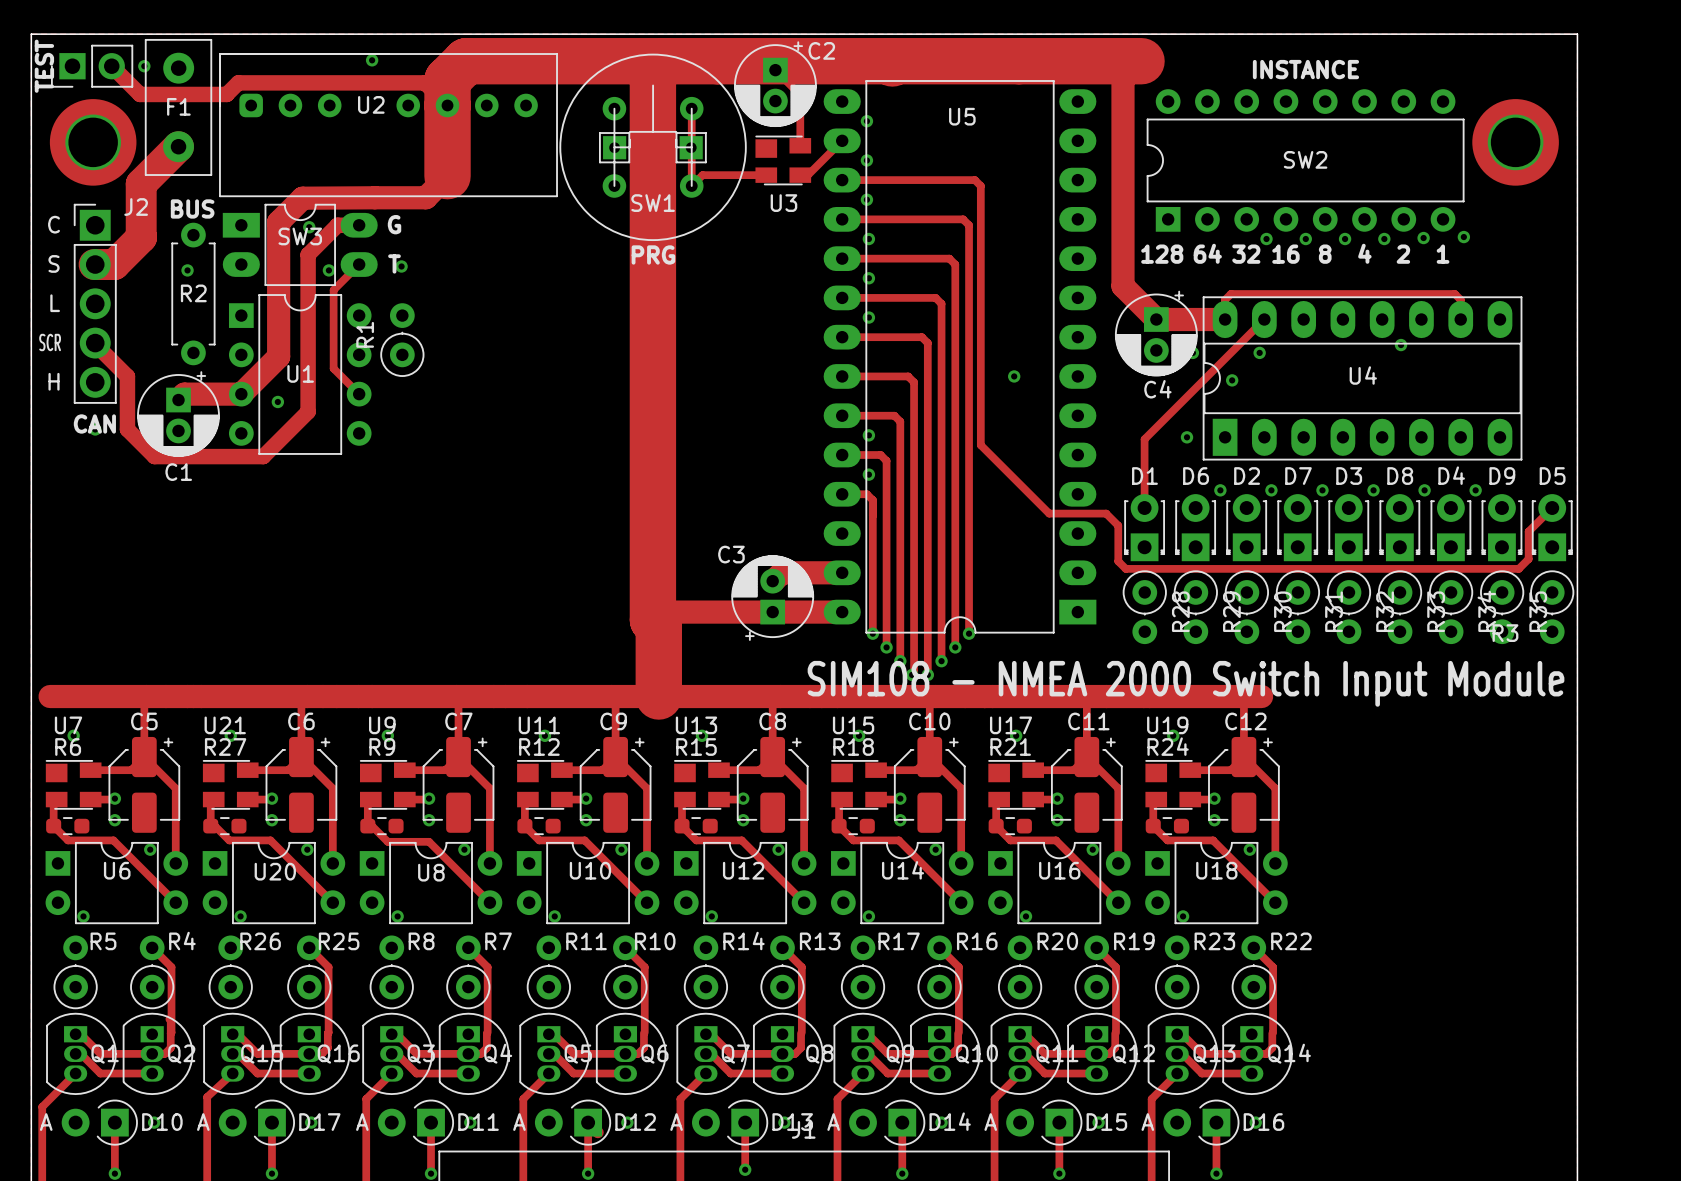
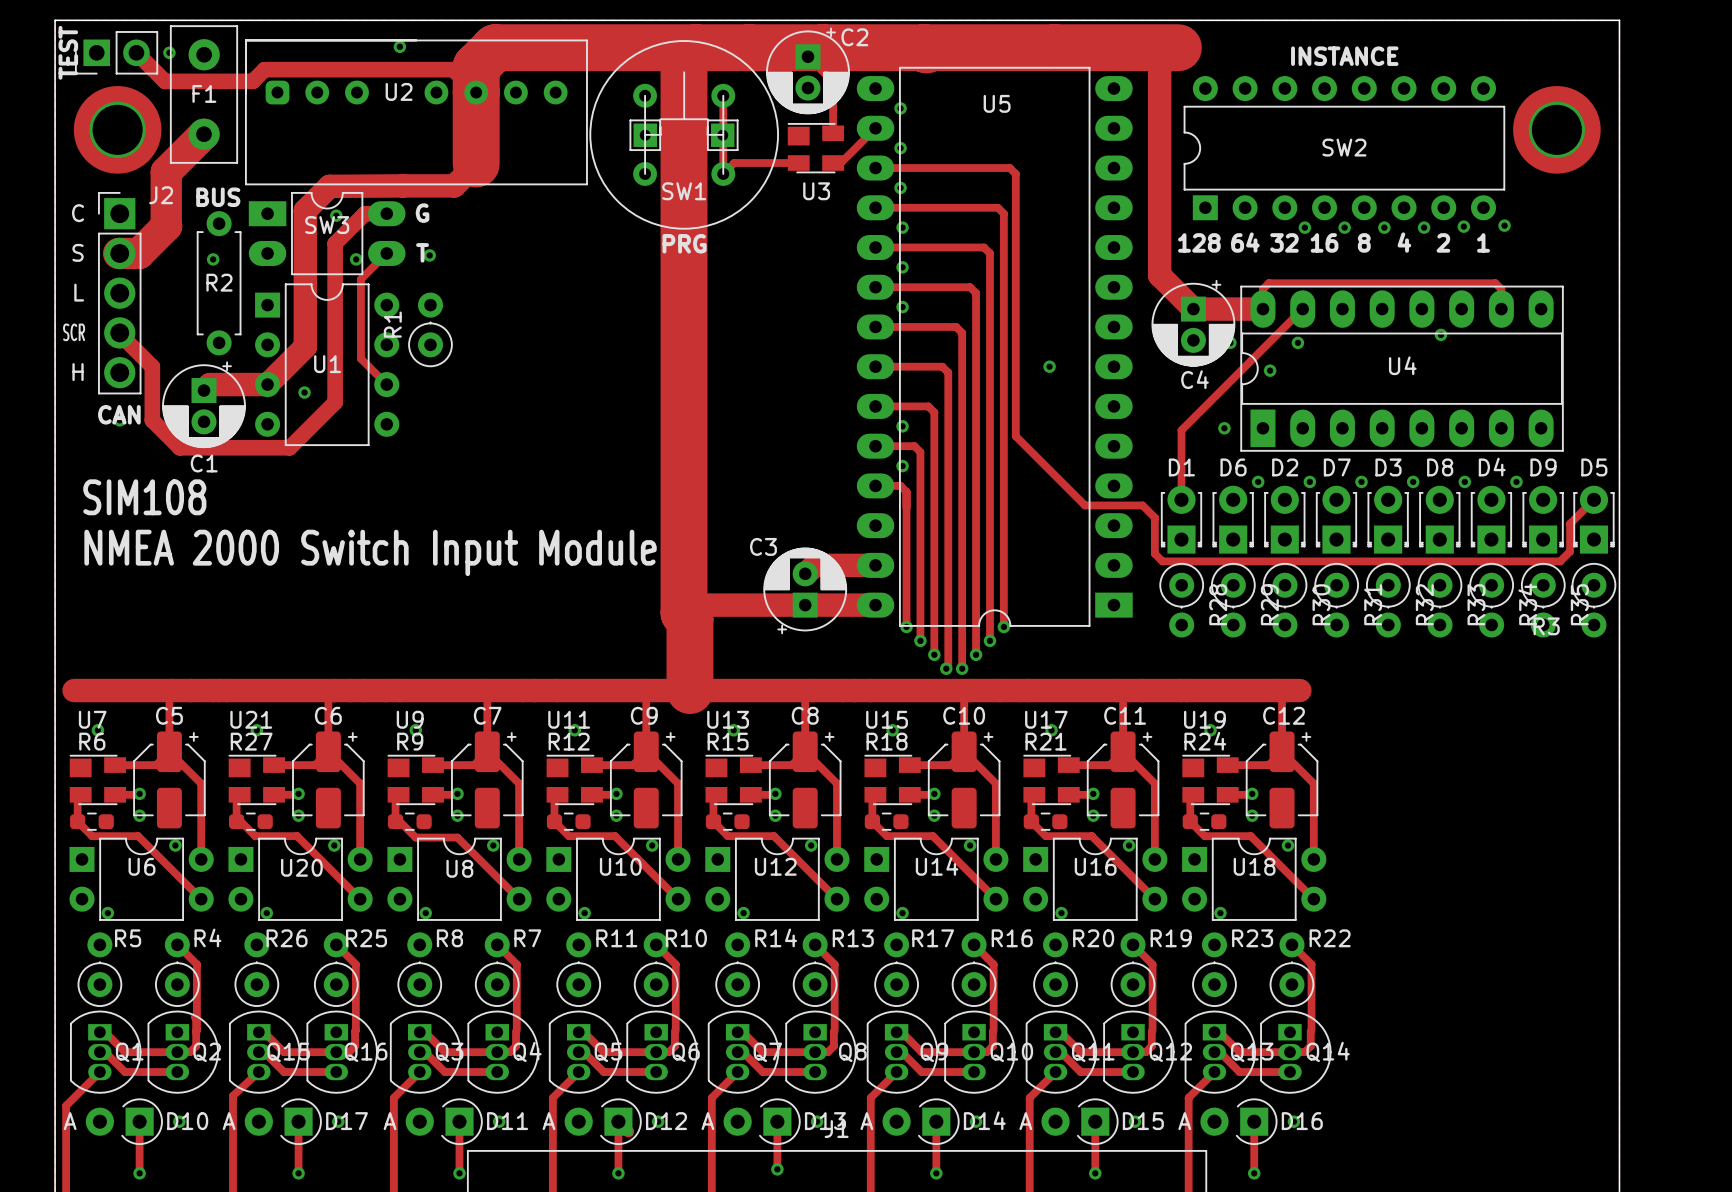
text: none -> SIM108 (144, 497)
text: none -> NMEA 2000 Switch Input Module (370, 552)
text: SIM108 - NMEA 2000 Switch Input Module (1186, 683) -> none

